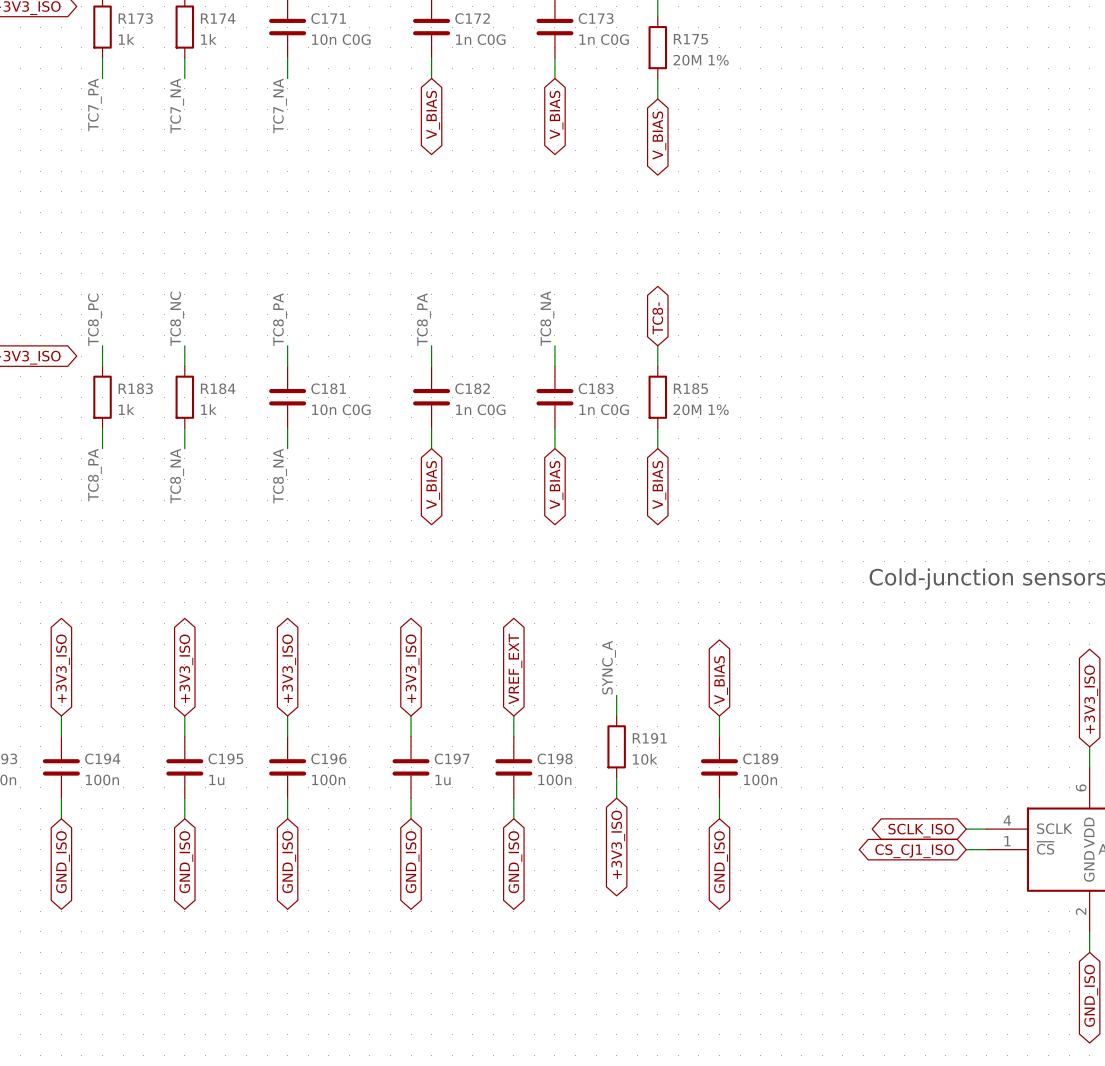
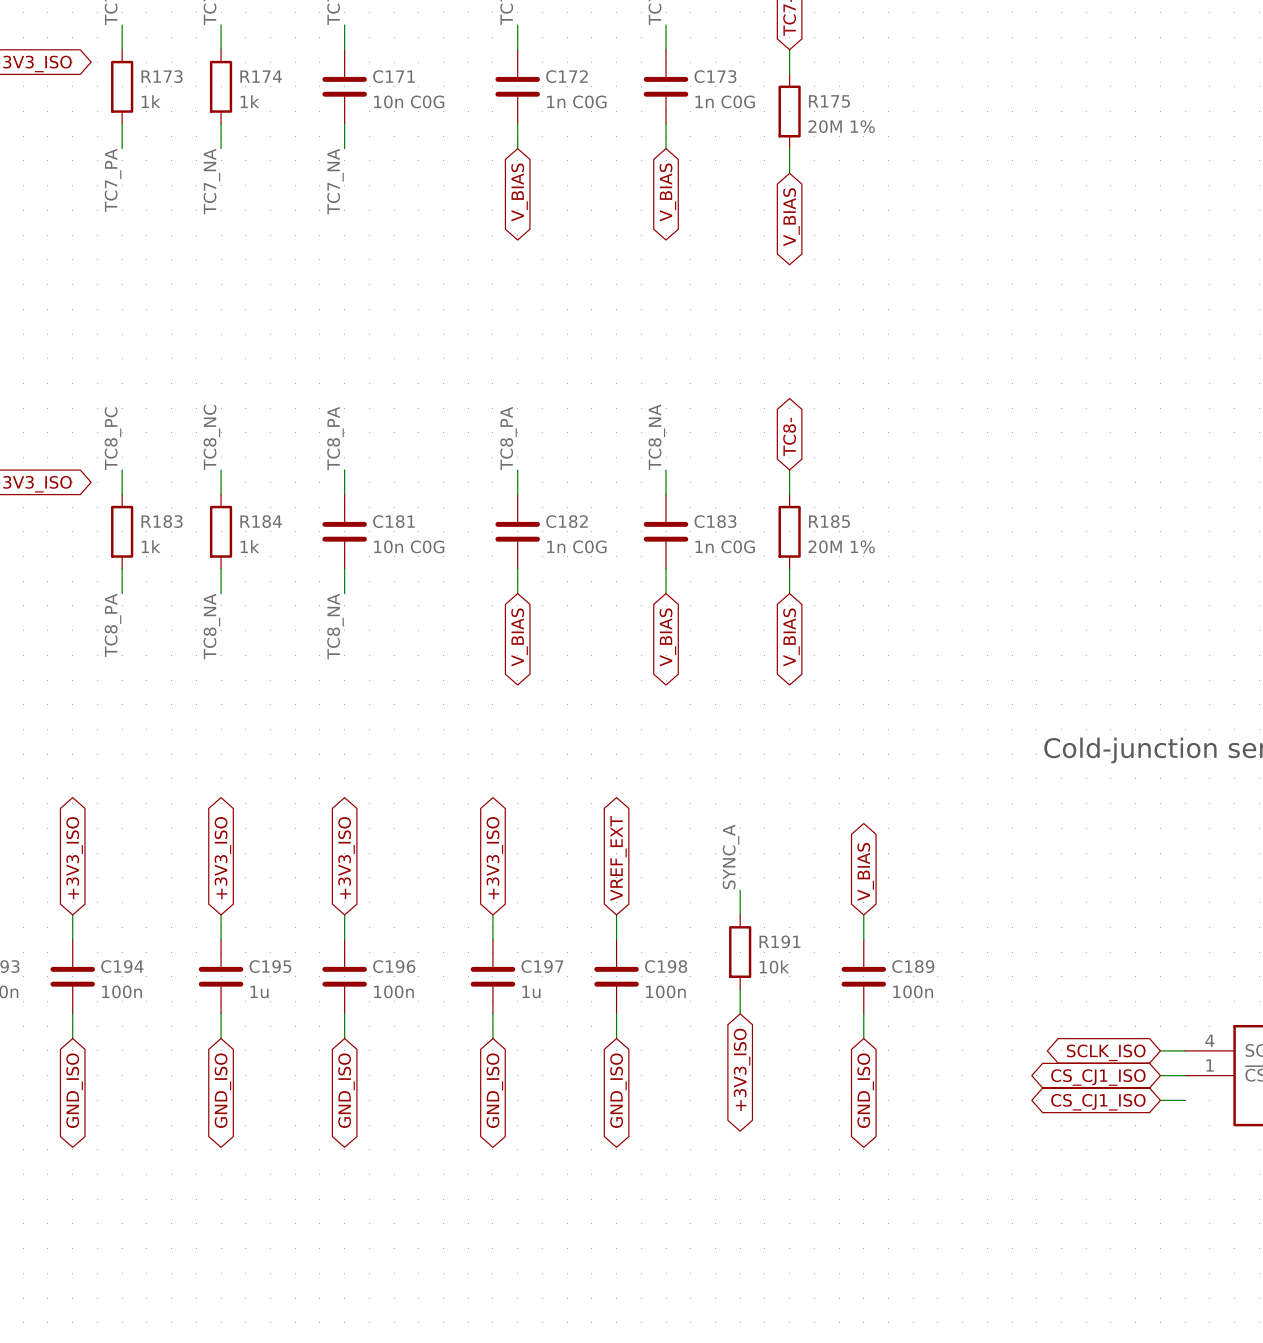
wire: none -> (1160, 1100) (1185, 1100)
global label: none -> CS_CJ1_ISO (1098, 1102)

